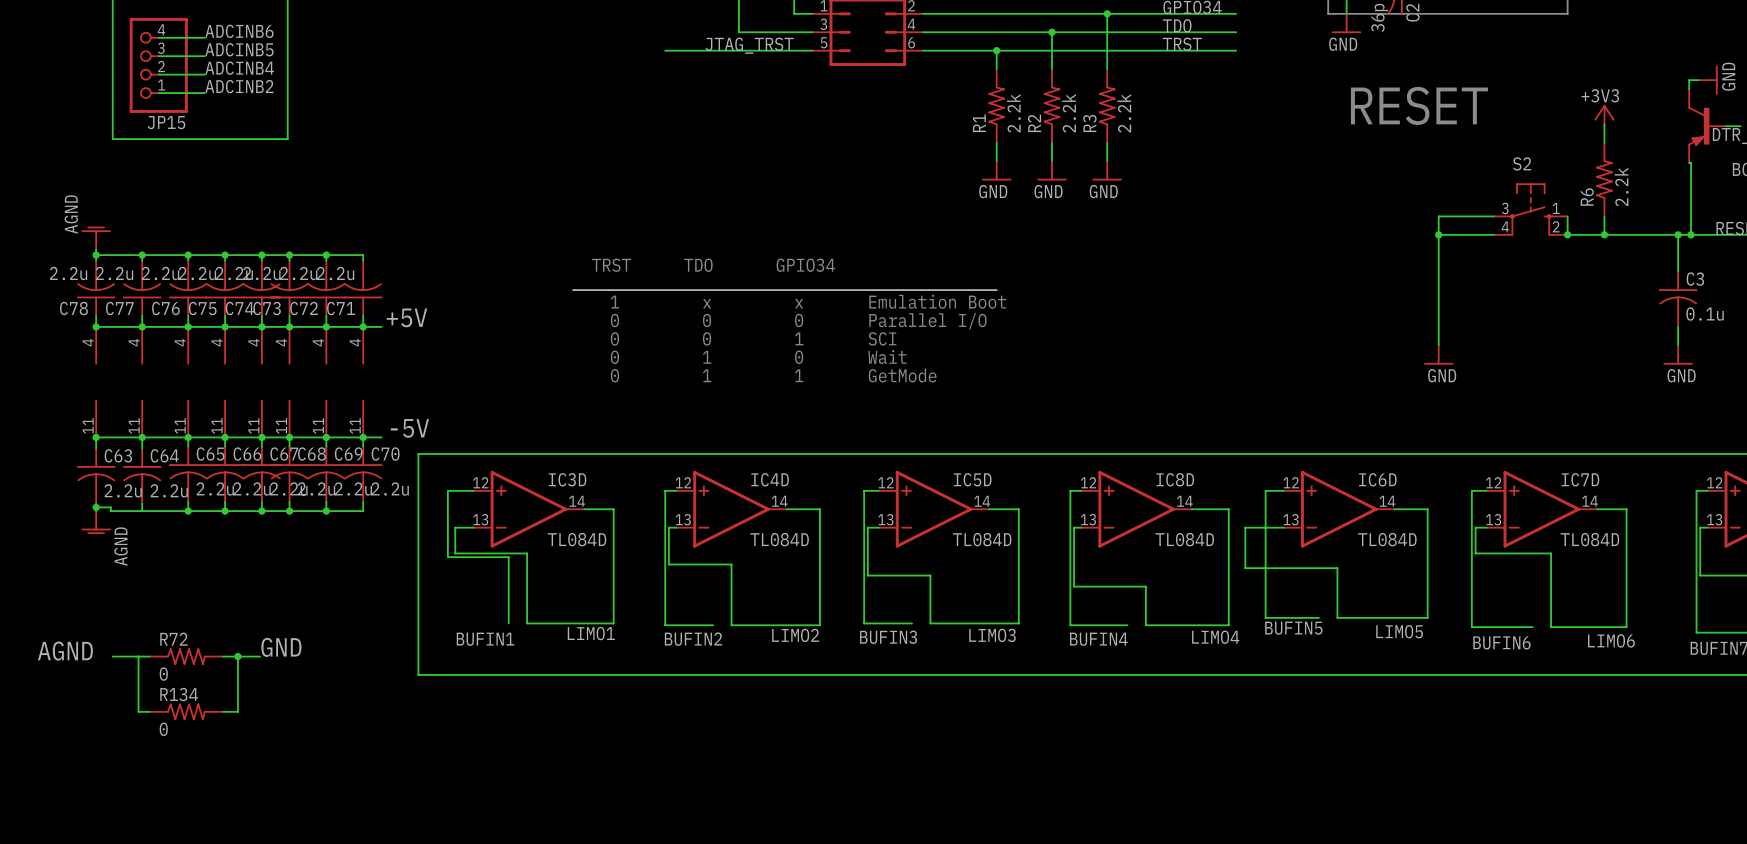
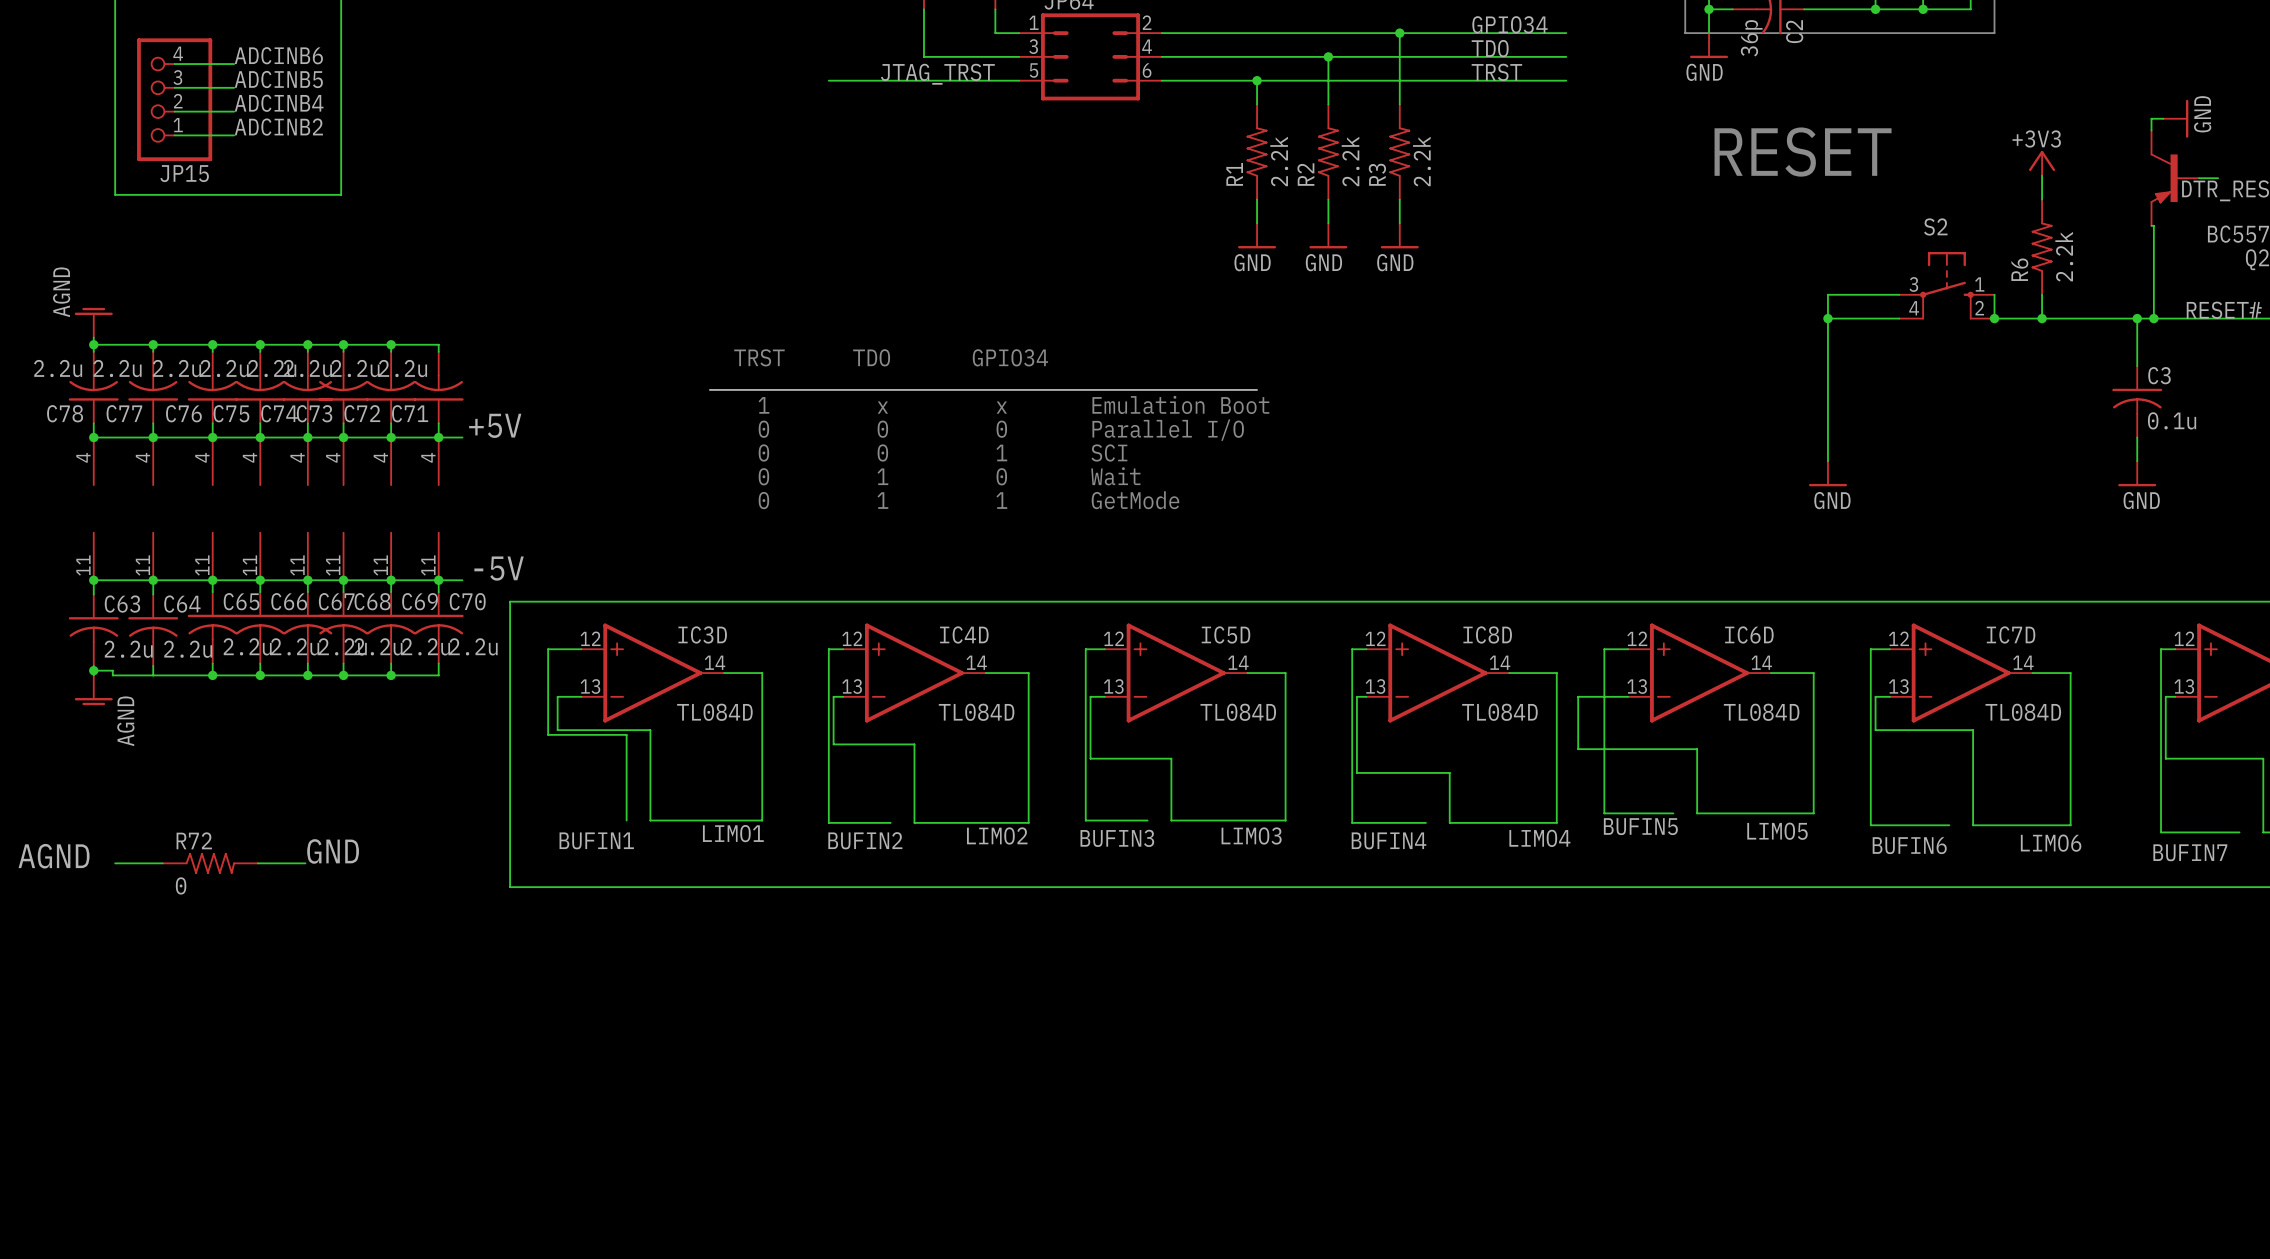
wire: (138, 656) (138, 711) (149, 711) -> none
wire: (237, 656) (237, 711) (223, 711) -> none
junction: (237, 656) -> none
R134: 0 (186, 711) -> none

